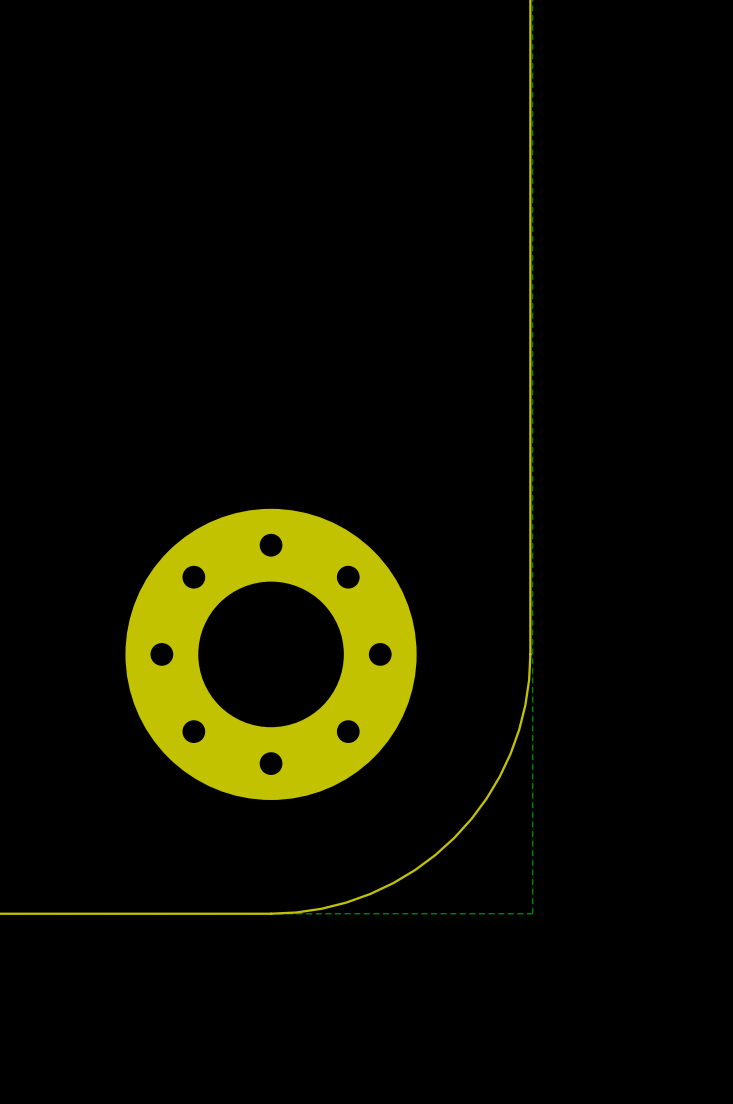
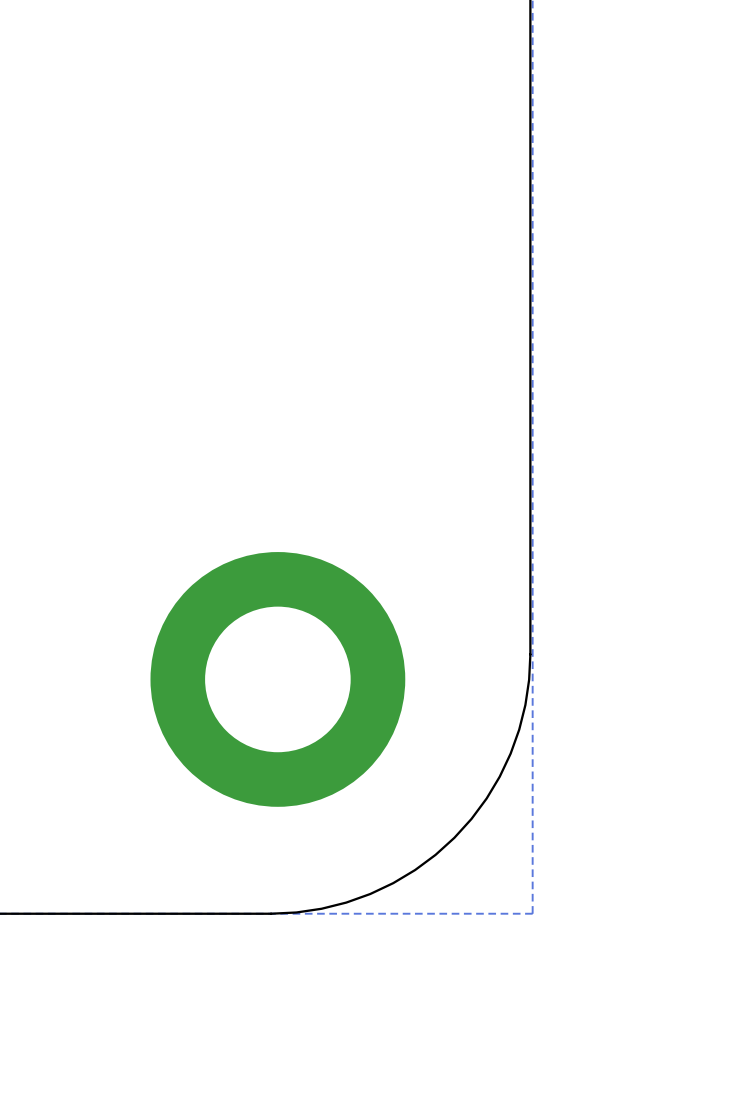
part footprint: [125, 508, 417, 800] -> [150, 552, 406, 807]

